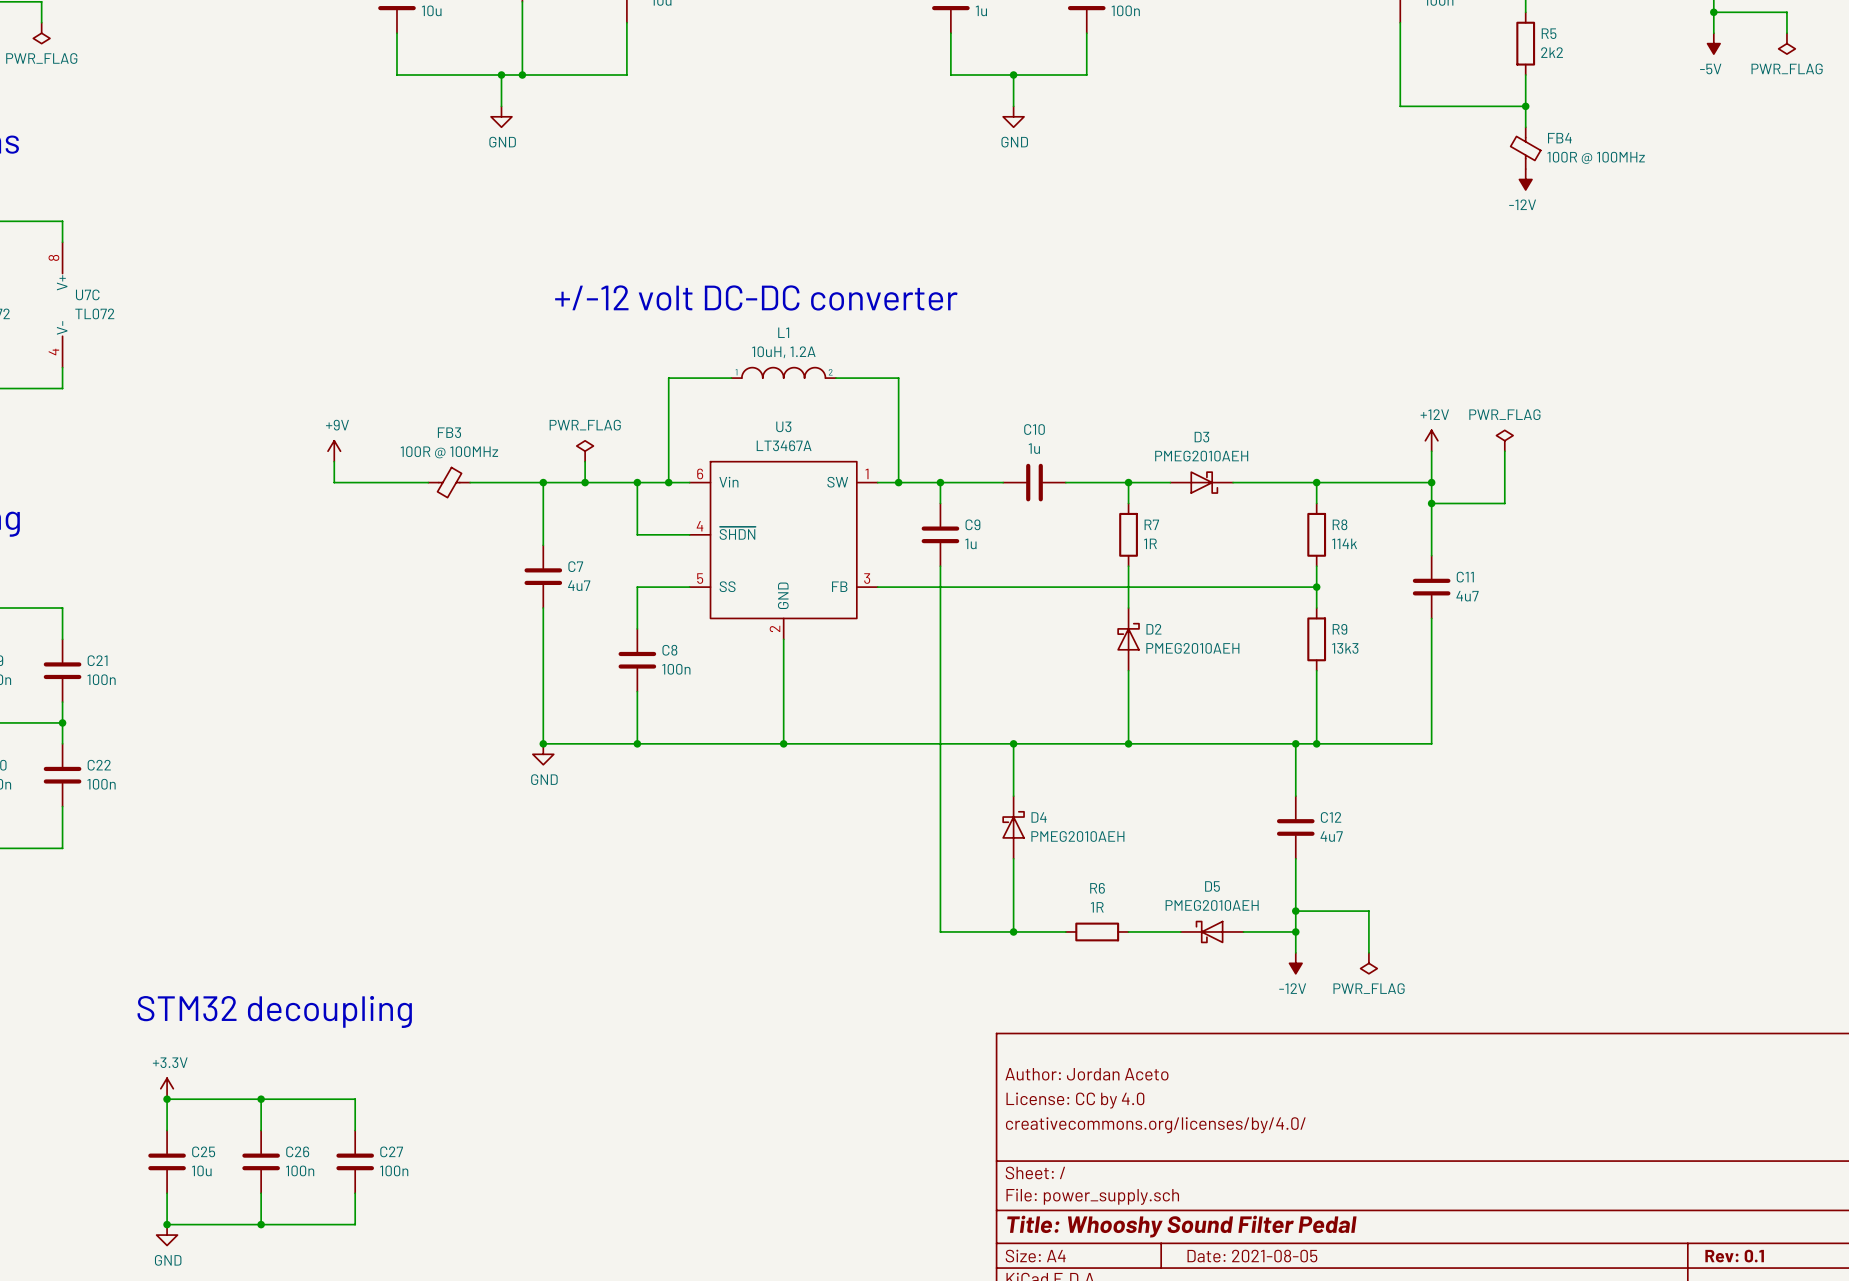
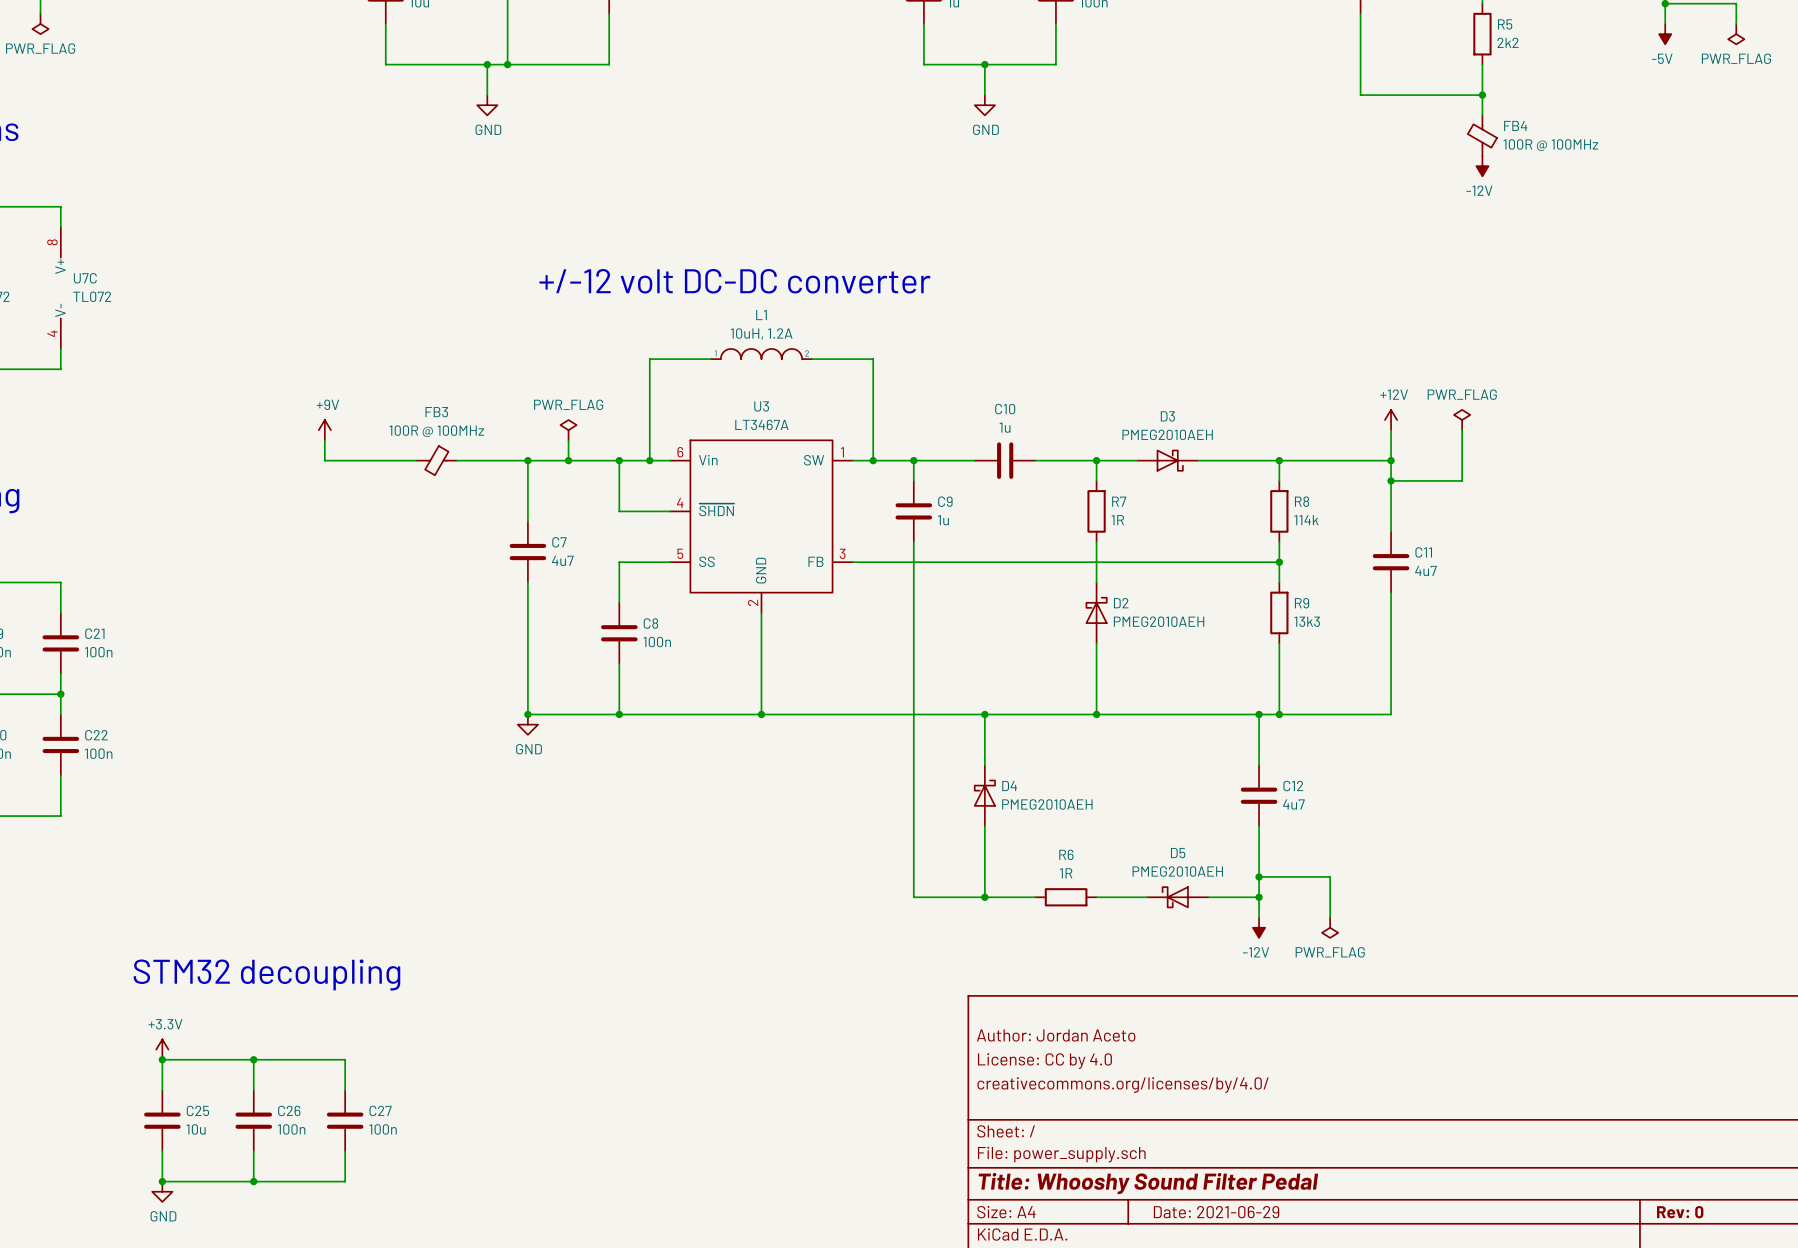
title block: Date: 2021-08-05 (1252, 1256) -> Date: 2021-06-29 (1216, 1212)
title block: Rev: 0.1 (1734, 1256) -> Rev: 0 (1680, 1212)

